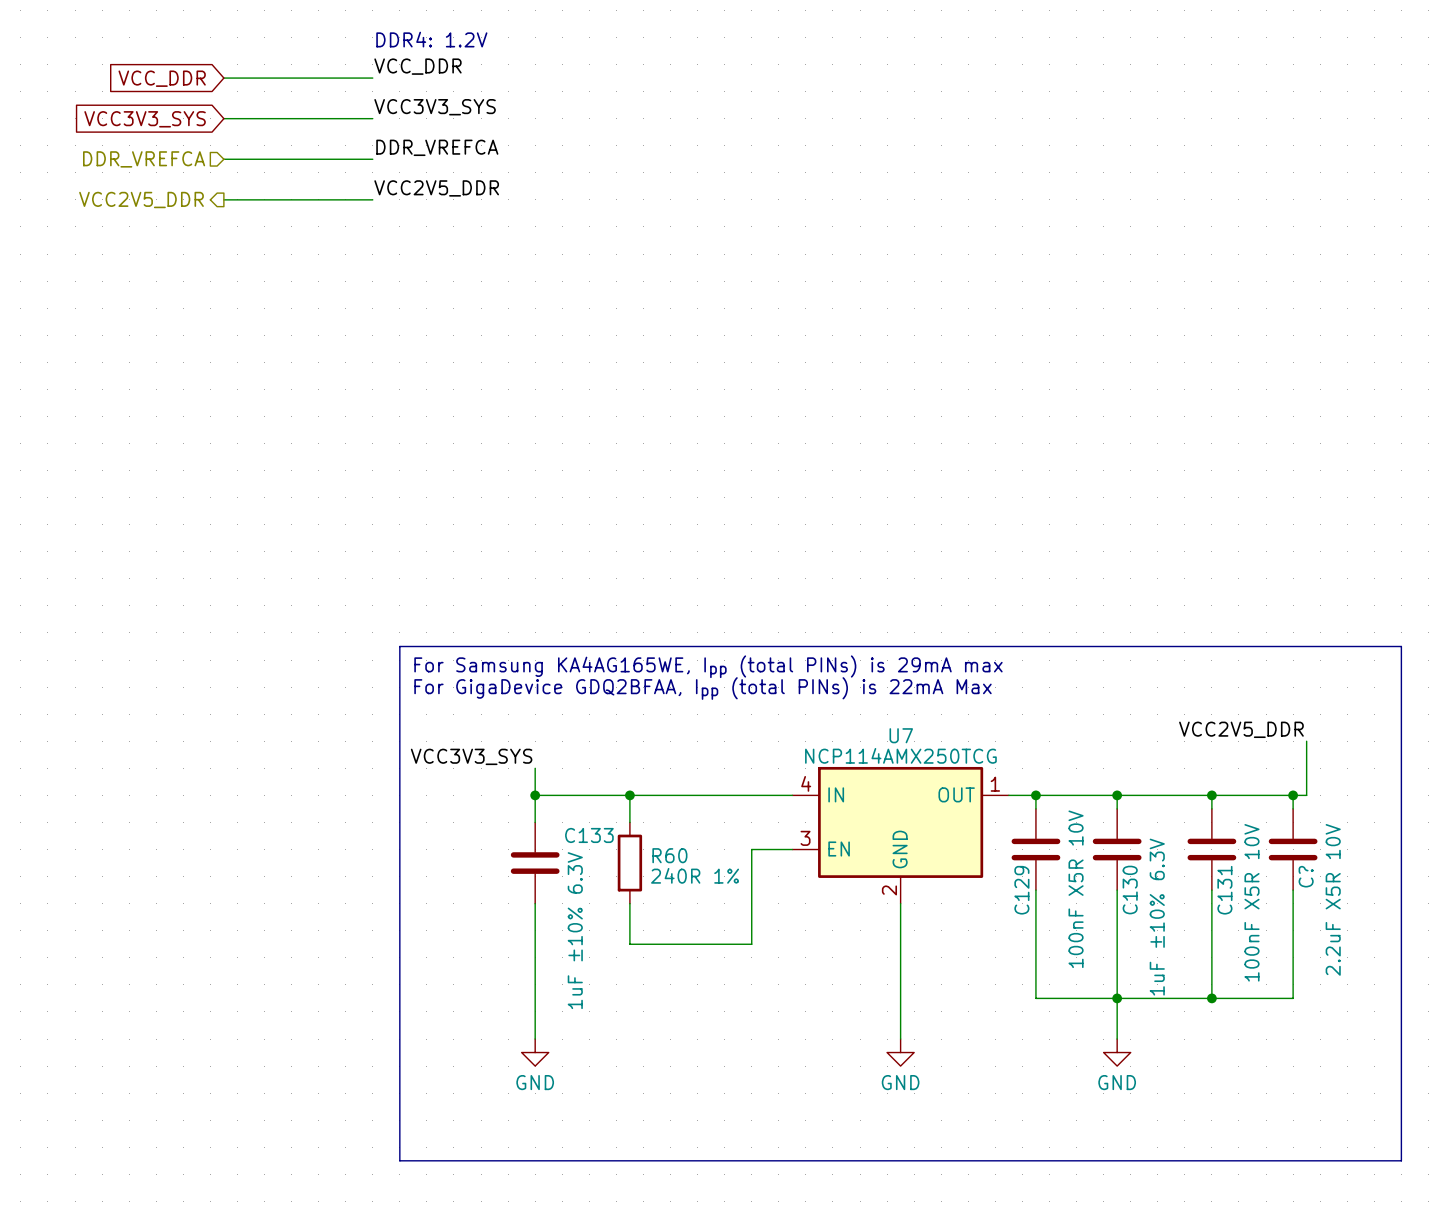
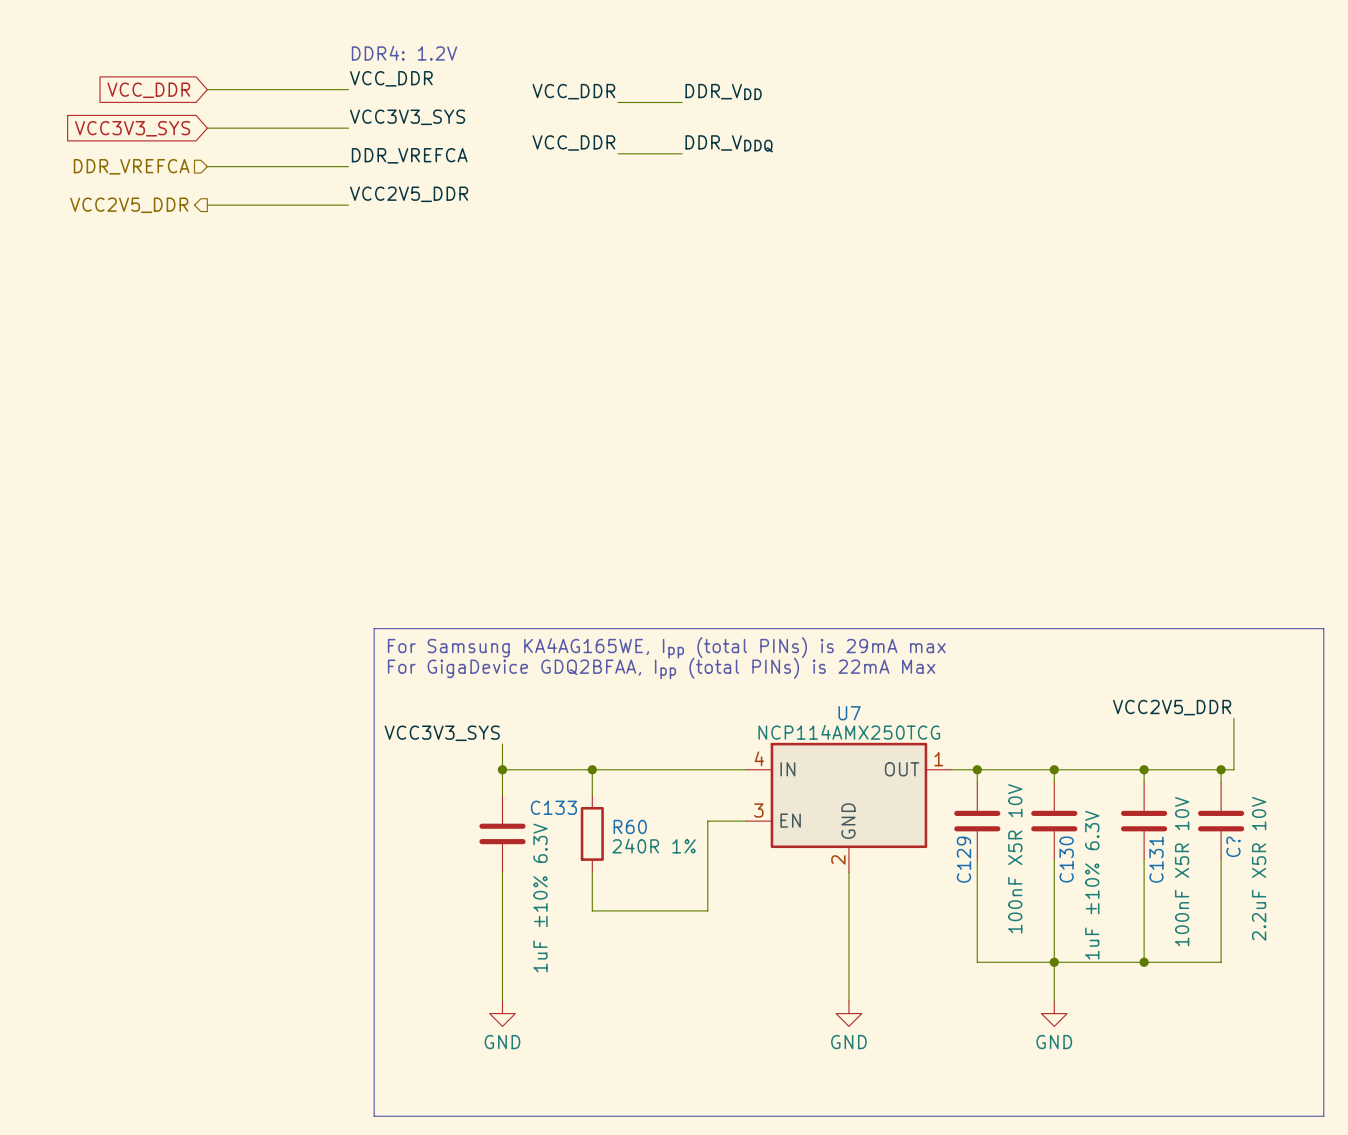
label: none -> VCC_DDR (573, 91)
label: none -> DDR_VDD (723, 92)
wire: none -> (617, 102) (682, 102)
label: none -> VCC_DDR (573, 142)
label: none -> DDR_VDDQ (729, 143)
wire: none -> (617, 153) (682, 153)

